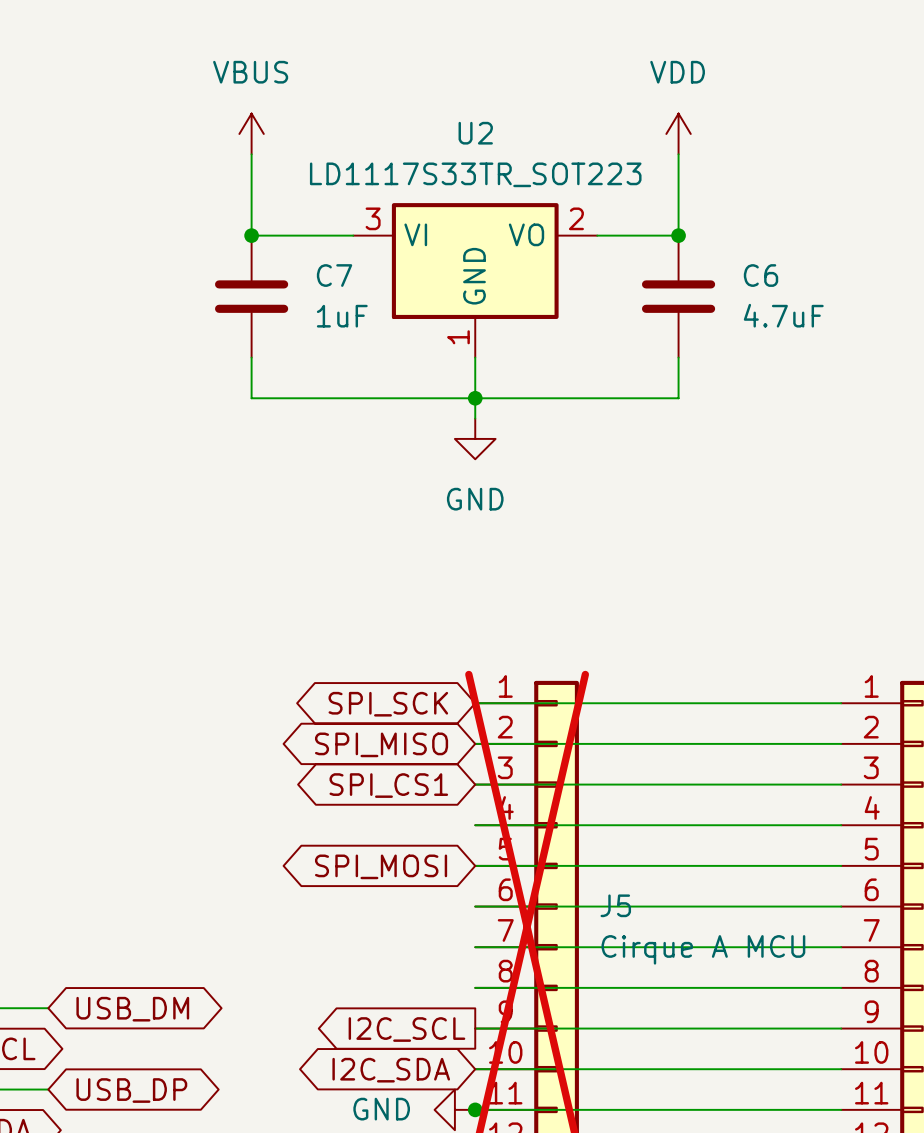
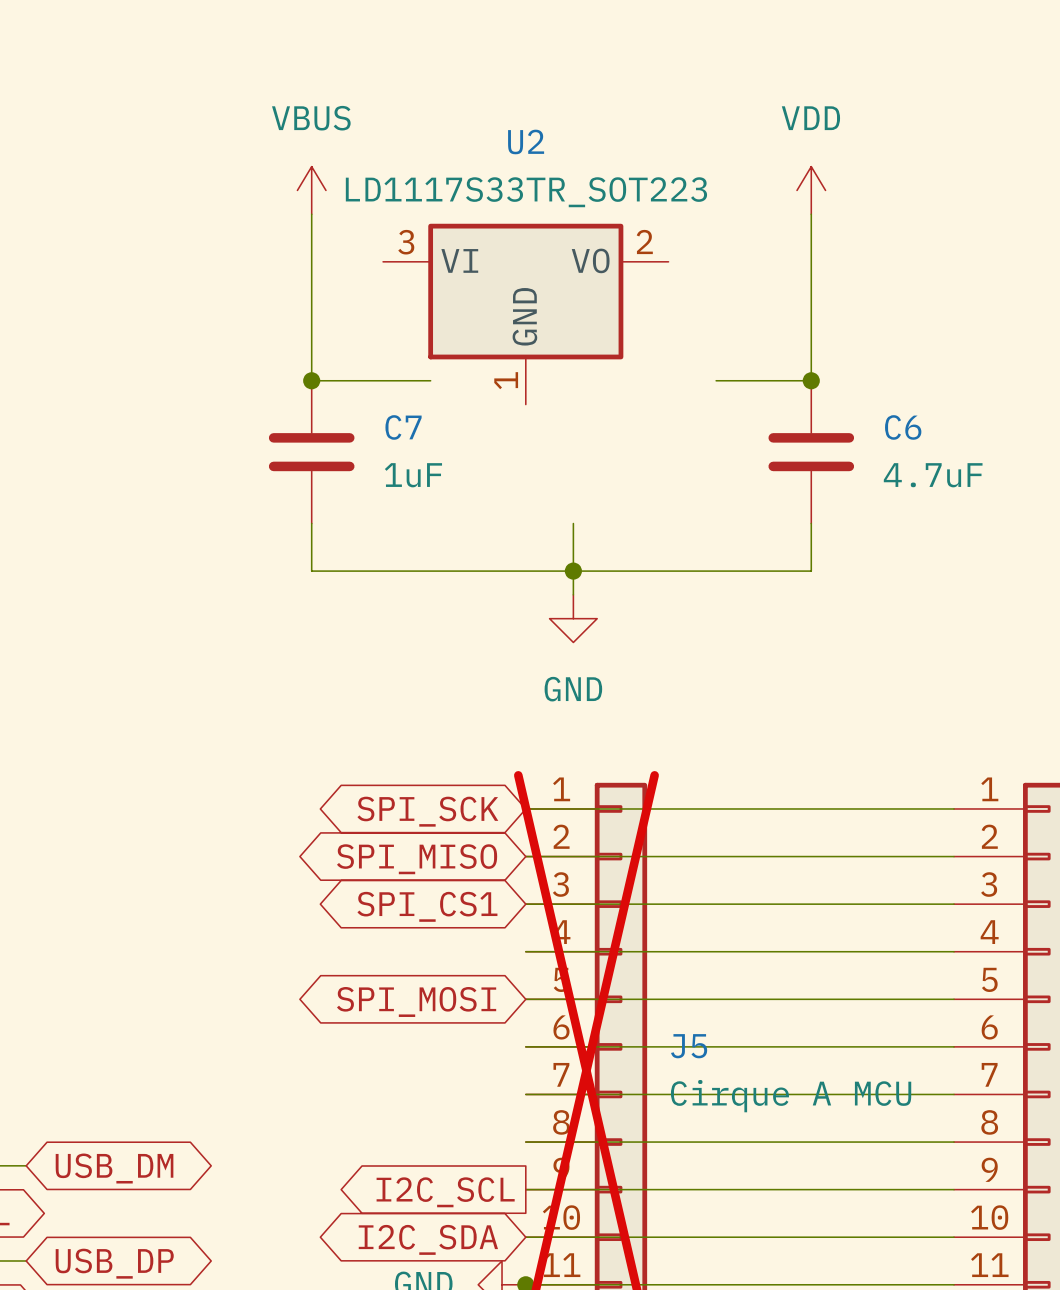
power symbol position: VBUS (251, 133) -> VBUS (311, 190)
power symbol position: VDD (678, 133) -> VDD (811, 190)
wire: (251, 154) (251, 235) (353, 235) -> none
wire: (678, 154) (678, 235) (597, 235) -> none
wire: none -> (311, 214) (311, 380) (430, 380)
wire: none -> (811, 214) (811, 380) (716, 380)
junction: (251, 235) -> none
junction: (678, 235) -> none
C7 position: (251, 296) -> (311, 452)
C6 position: (678, 296) -> (811, 452)
junction: none -> (311, 380)
junction: none -> (811, 380)
wire: (251, 357) (251, 398) (678, 398) (678, 357) -> (311, 523) (311, 571) (811, 571) (811, 523)
wire: (475, 357) (475, 418) -> (573, 523) (573, 594)
junction: (475, 398) -> none
power symbol position: GND (475, 438) -> GND (573, 618)
junction: none -> (573, 571)

